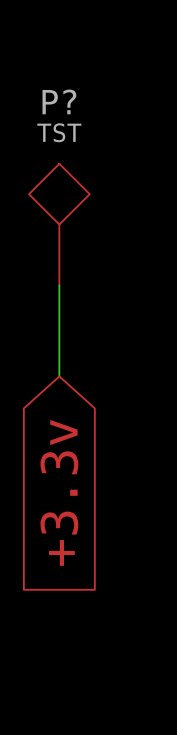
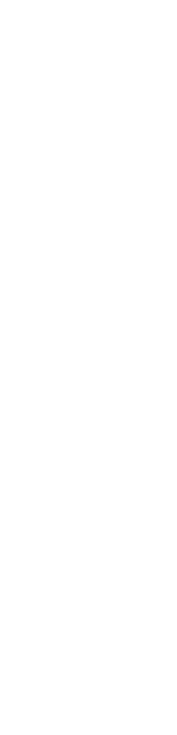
P?: TST (59, 224) -> none
wire: (59, 285) (59, 376) -> none
global label: +3.3v (59, 492) -> none

